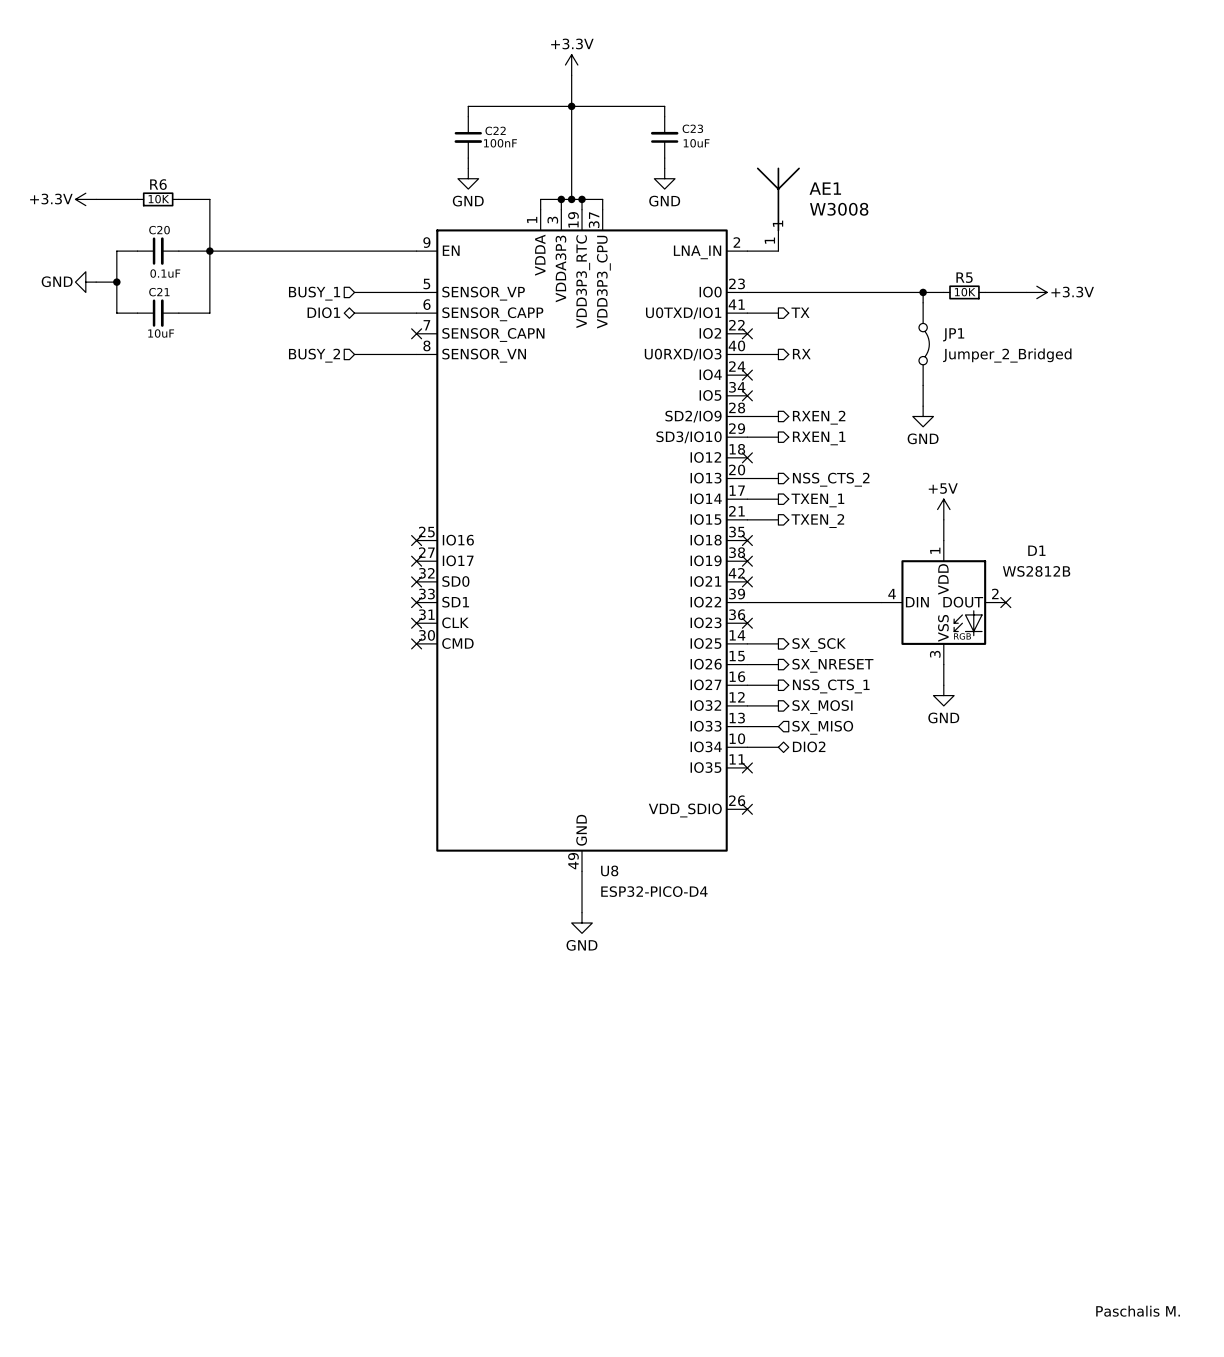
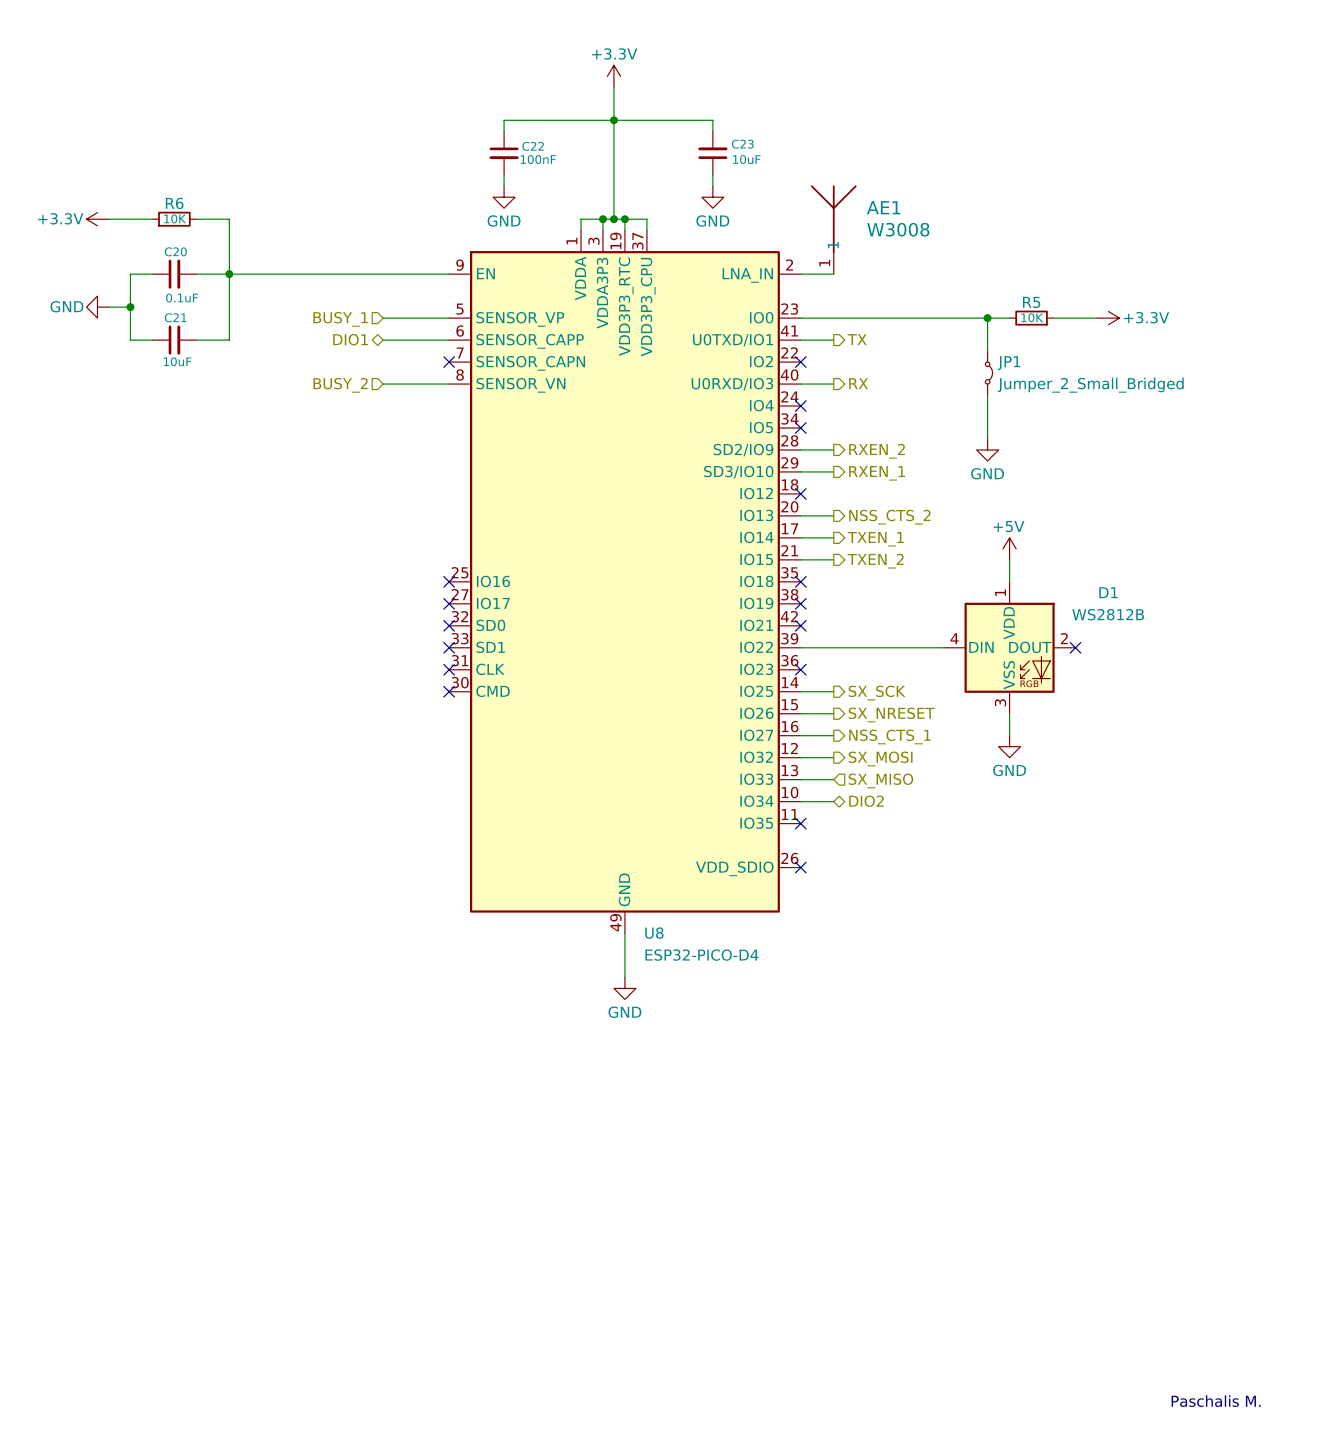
JP1 symbol: [918, 302, 930, 386] -> [985, 351, 993, 396]
JP1 value: Jumper_2_Bridged (1007, 355) -> Jumper_2_Small_Bridged (1090, 385)

